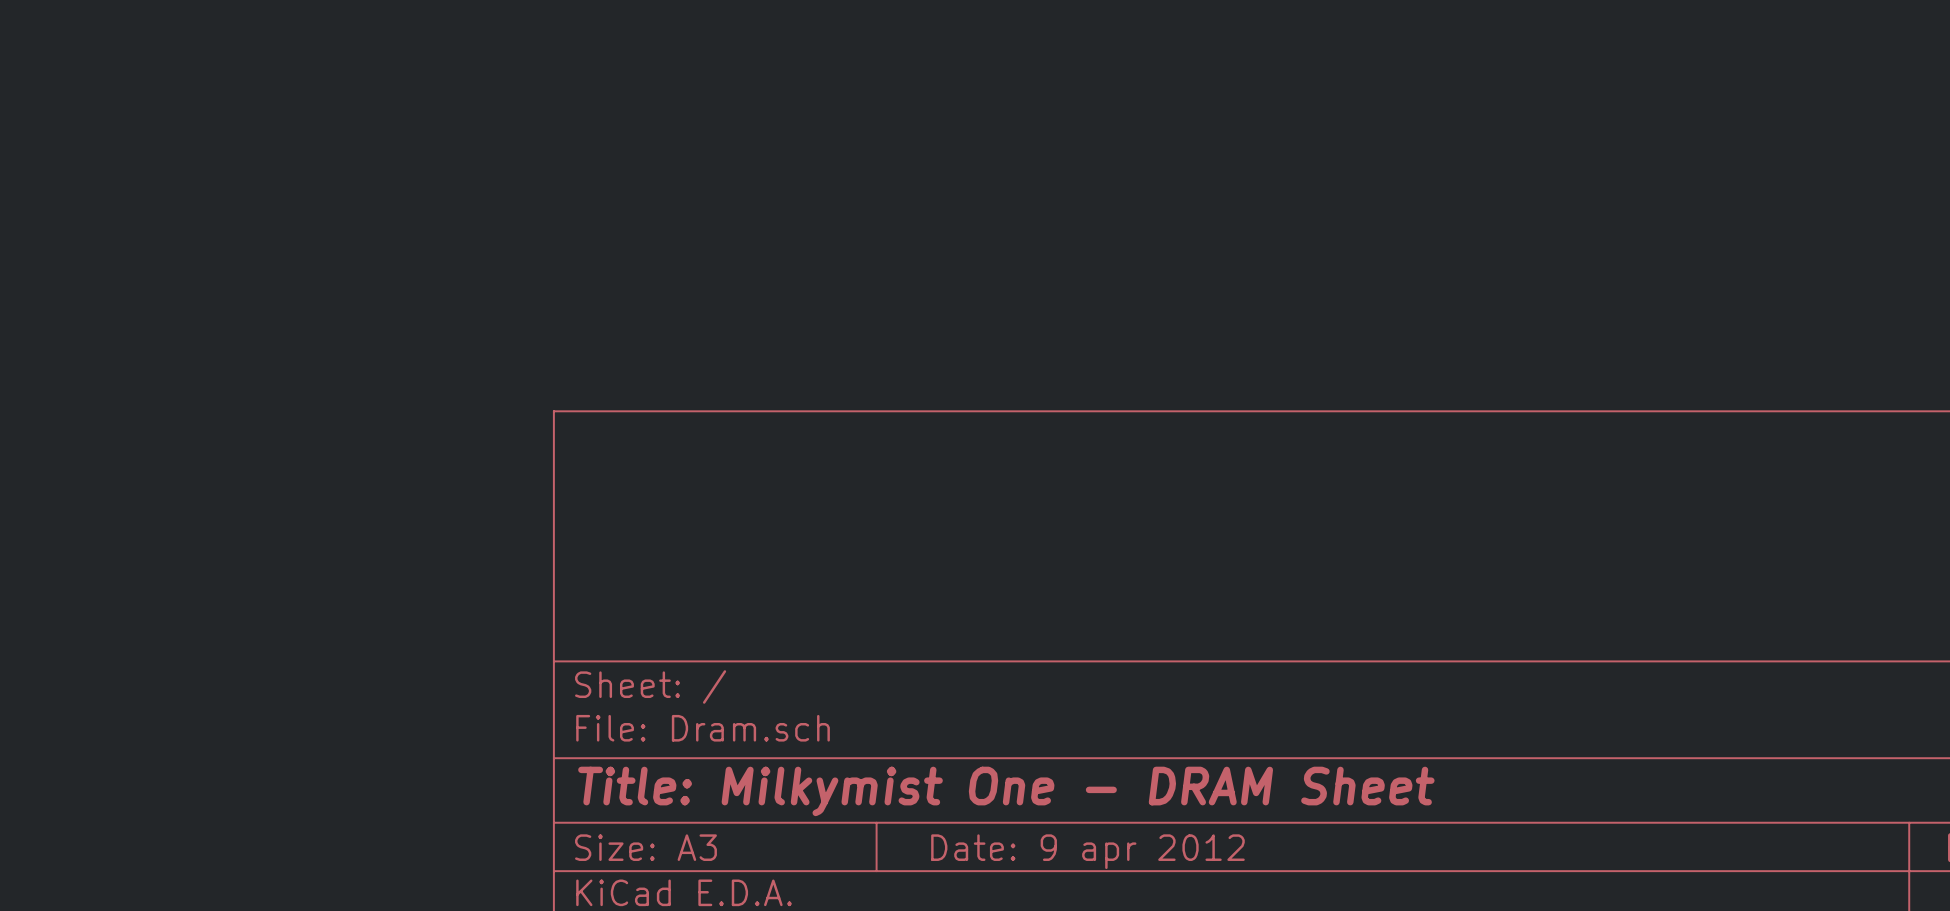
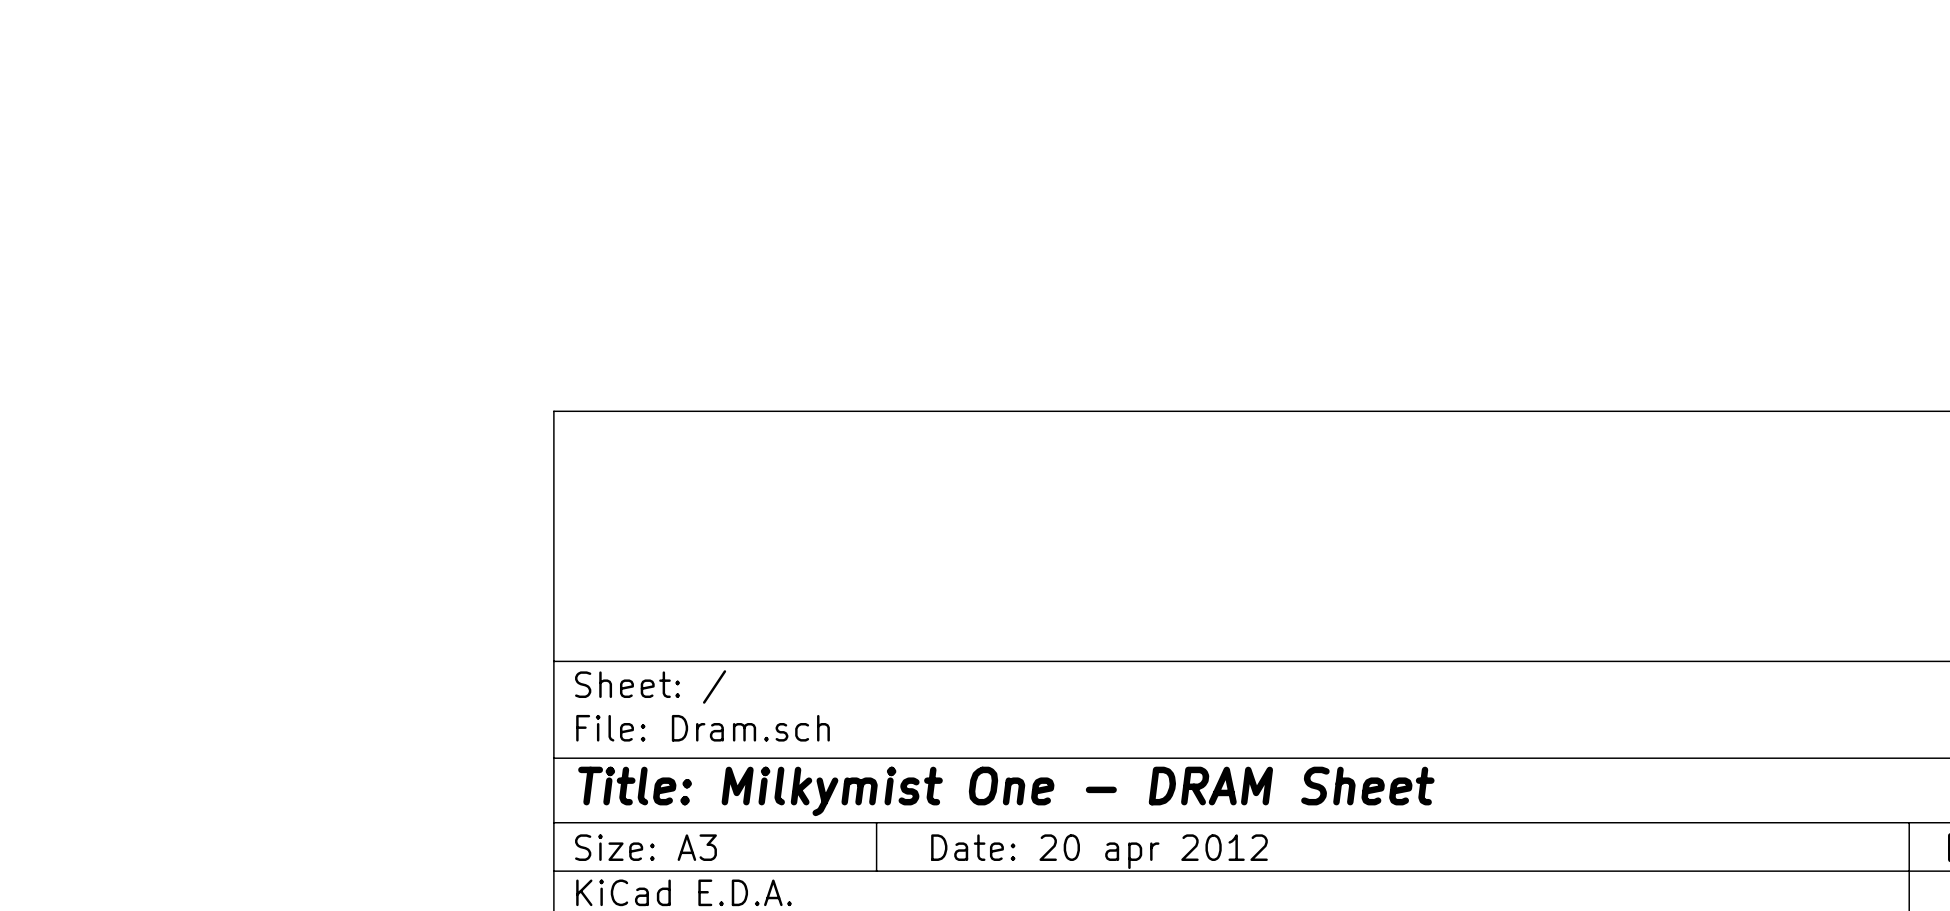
title block: Date: 9 apr 2012 (1087, 851) -> Date: 20 apr 2012 (1099, 851)

